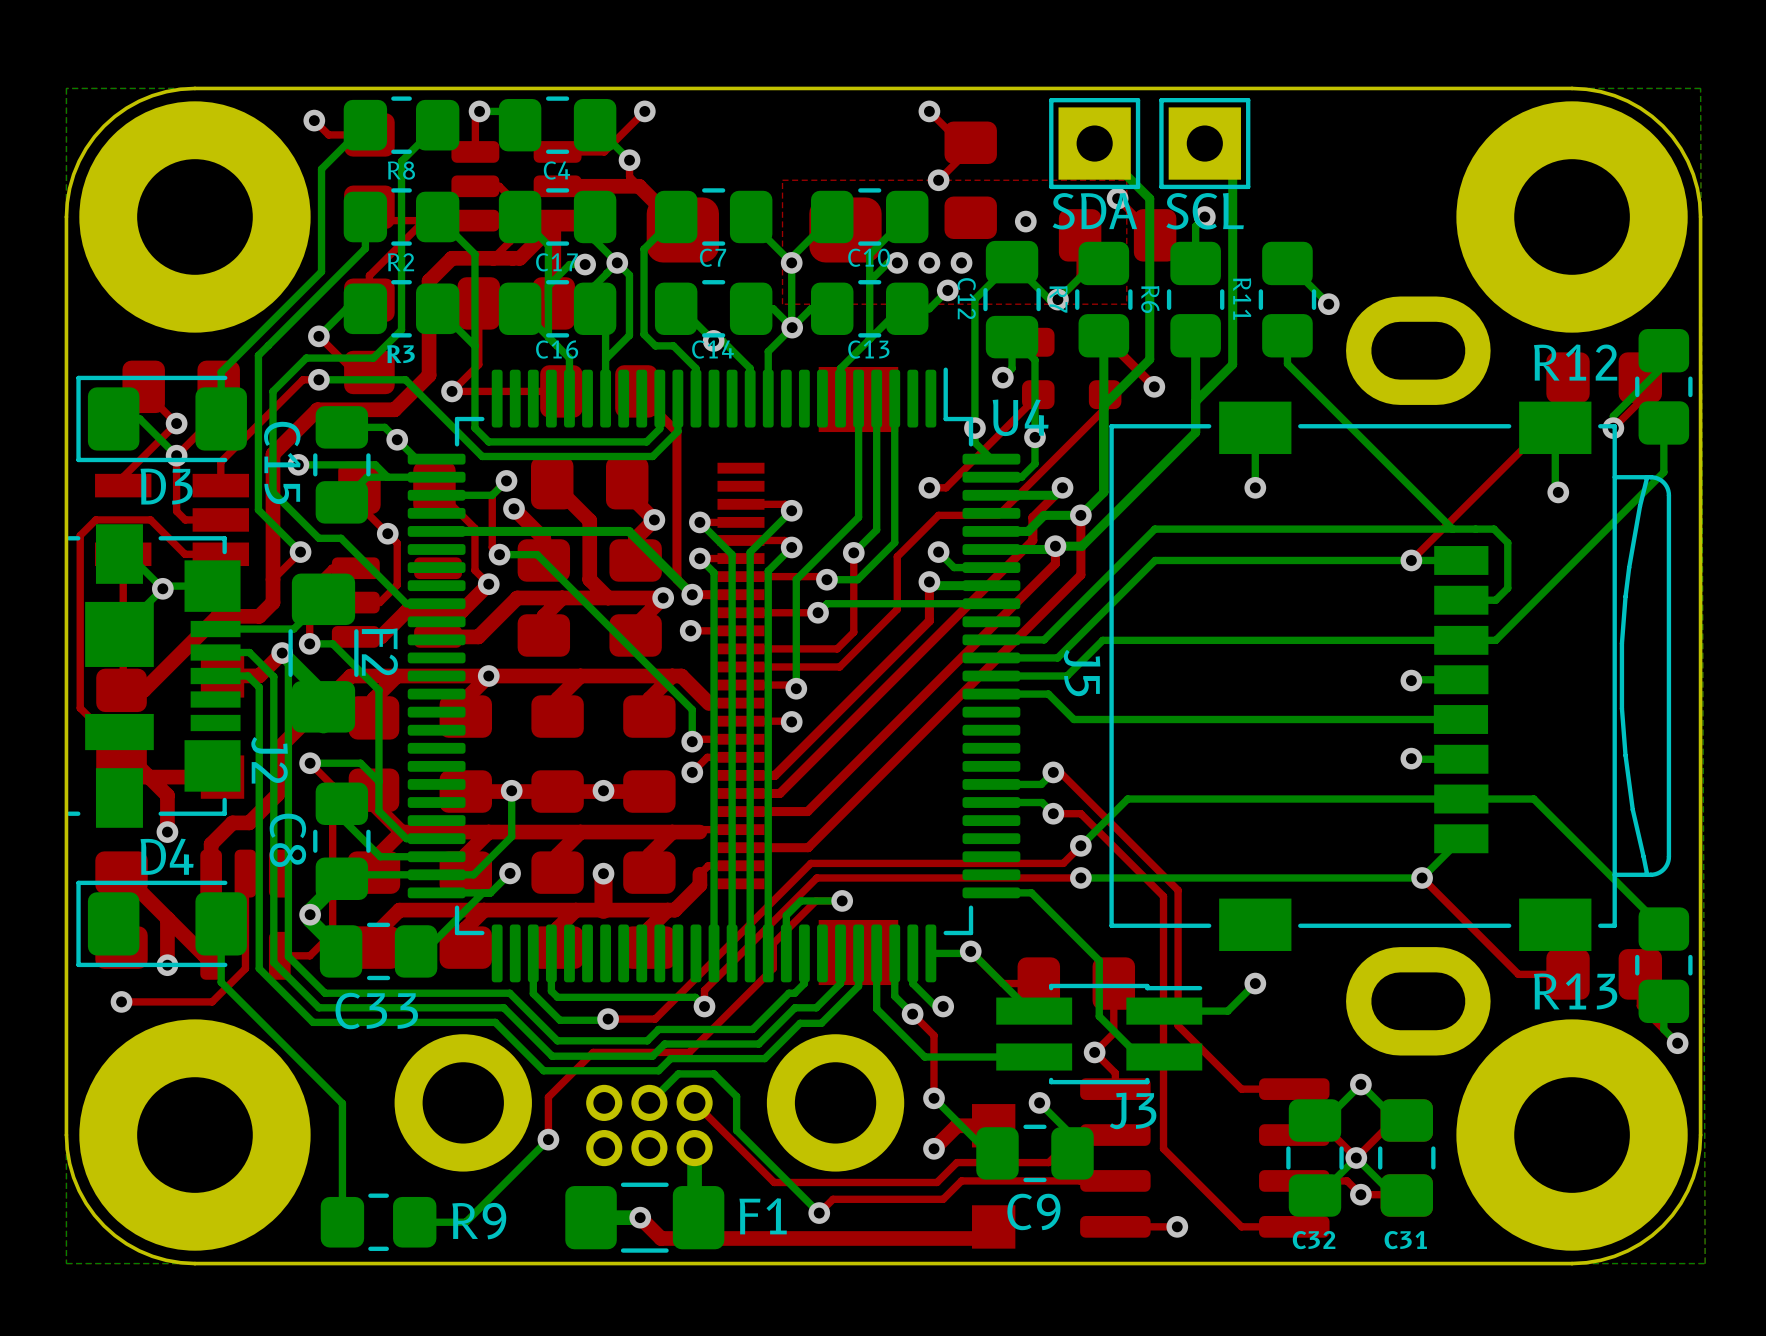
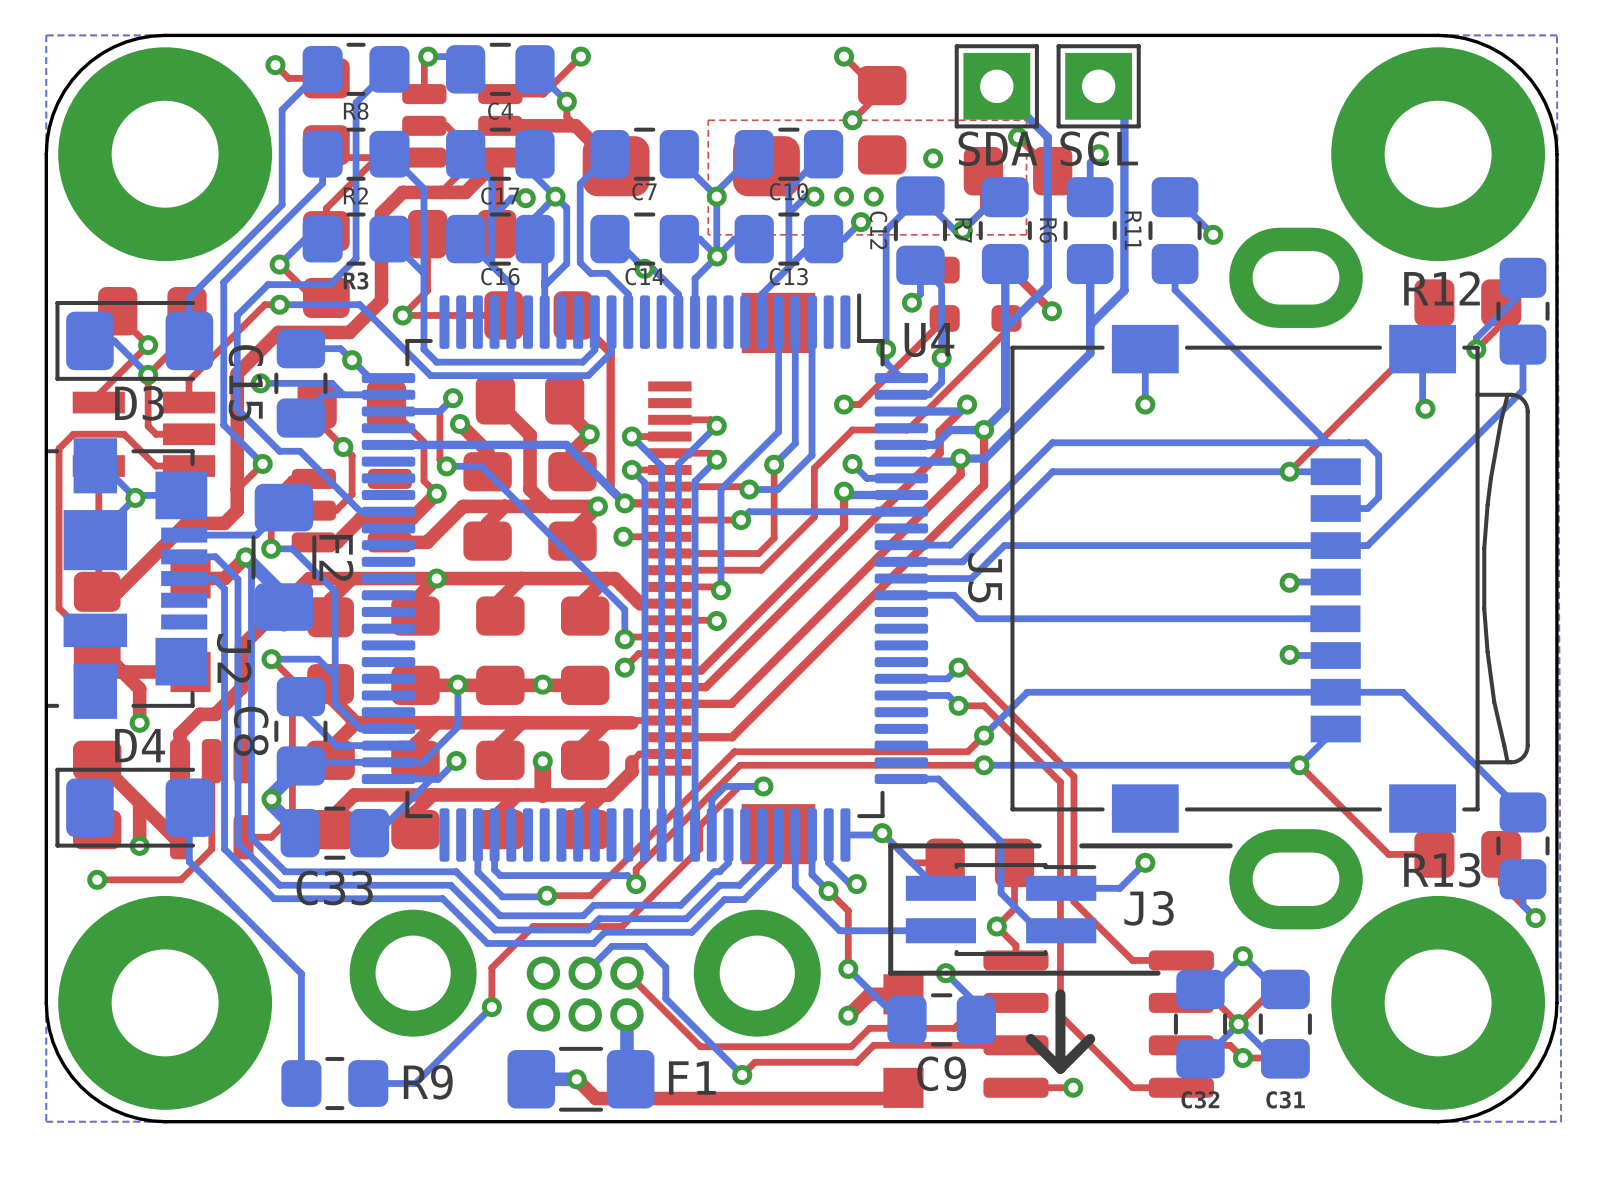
line: none -> (1039, 845) (890, 845) (890, 973) (1158, 973)
line: none -> (1230, 845) (1081, 845)
J3 name position: J3 (1133, 1110) -> J3 (1149, 908)
line: none -> (1060, 994) (1060, 1068)
line: none -> (1030, 1038) (1060, 1068)
line: none -> (1090, 1038) (1060, 1068)

